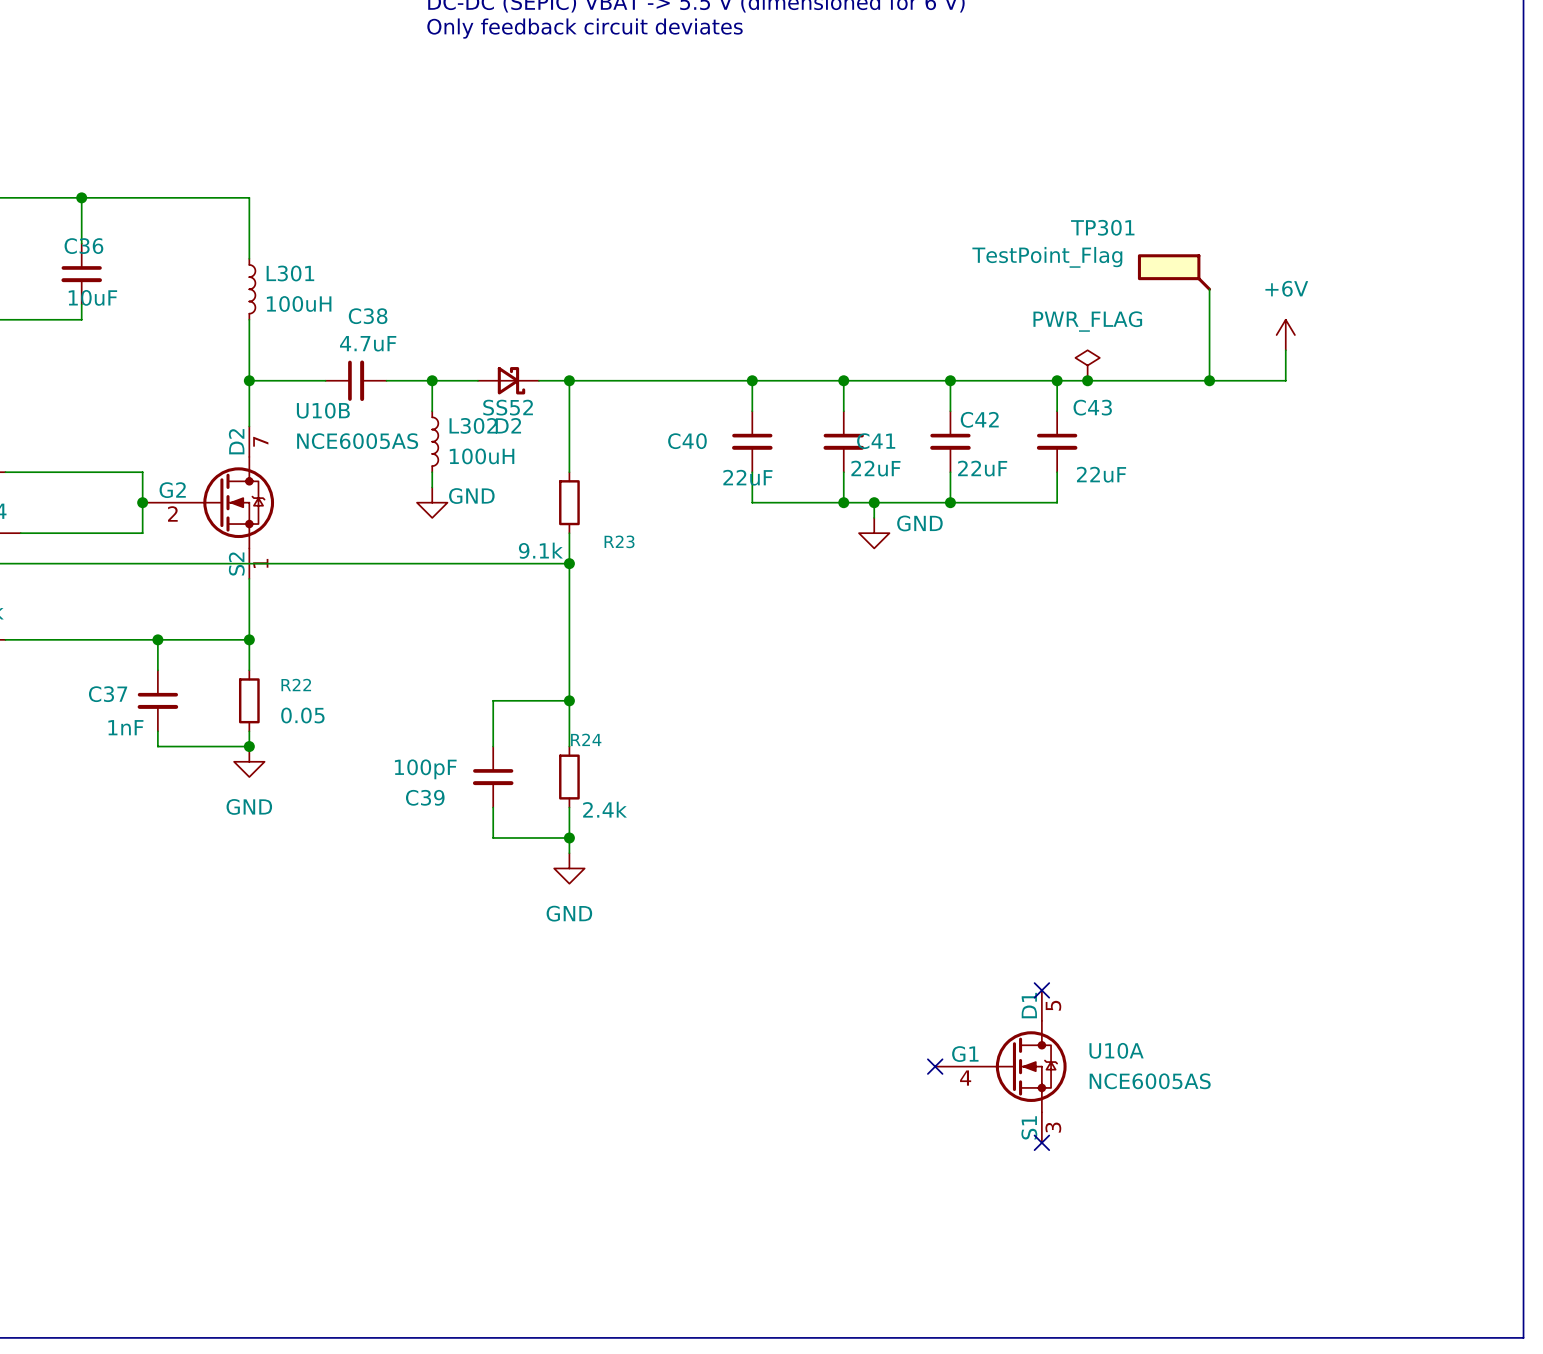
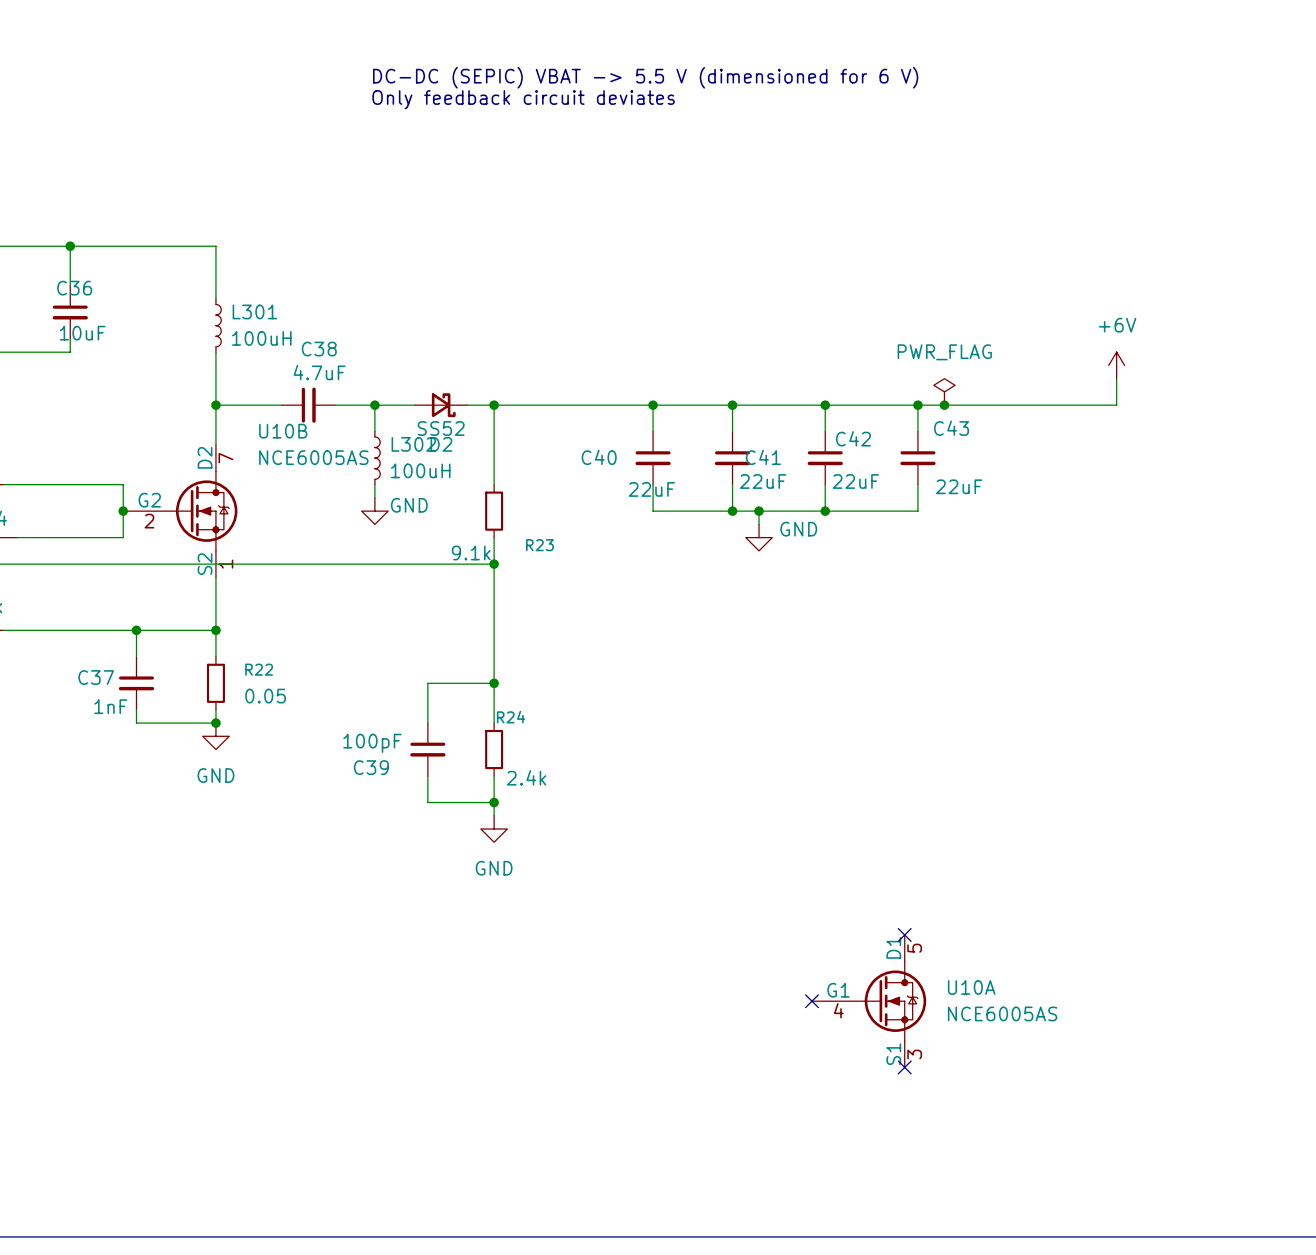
TP301: TestPoint_Flag (1174, 272) -> none
wire: (1209, 289) (1209, 380) -> none
junction: (1209, 380) -> none

